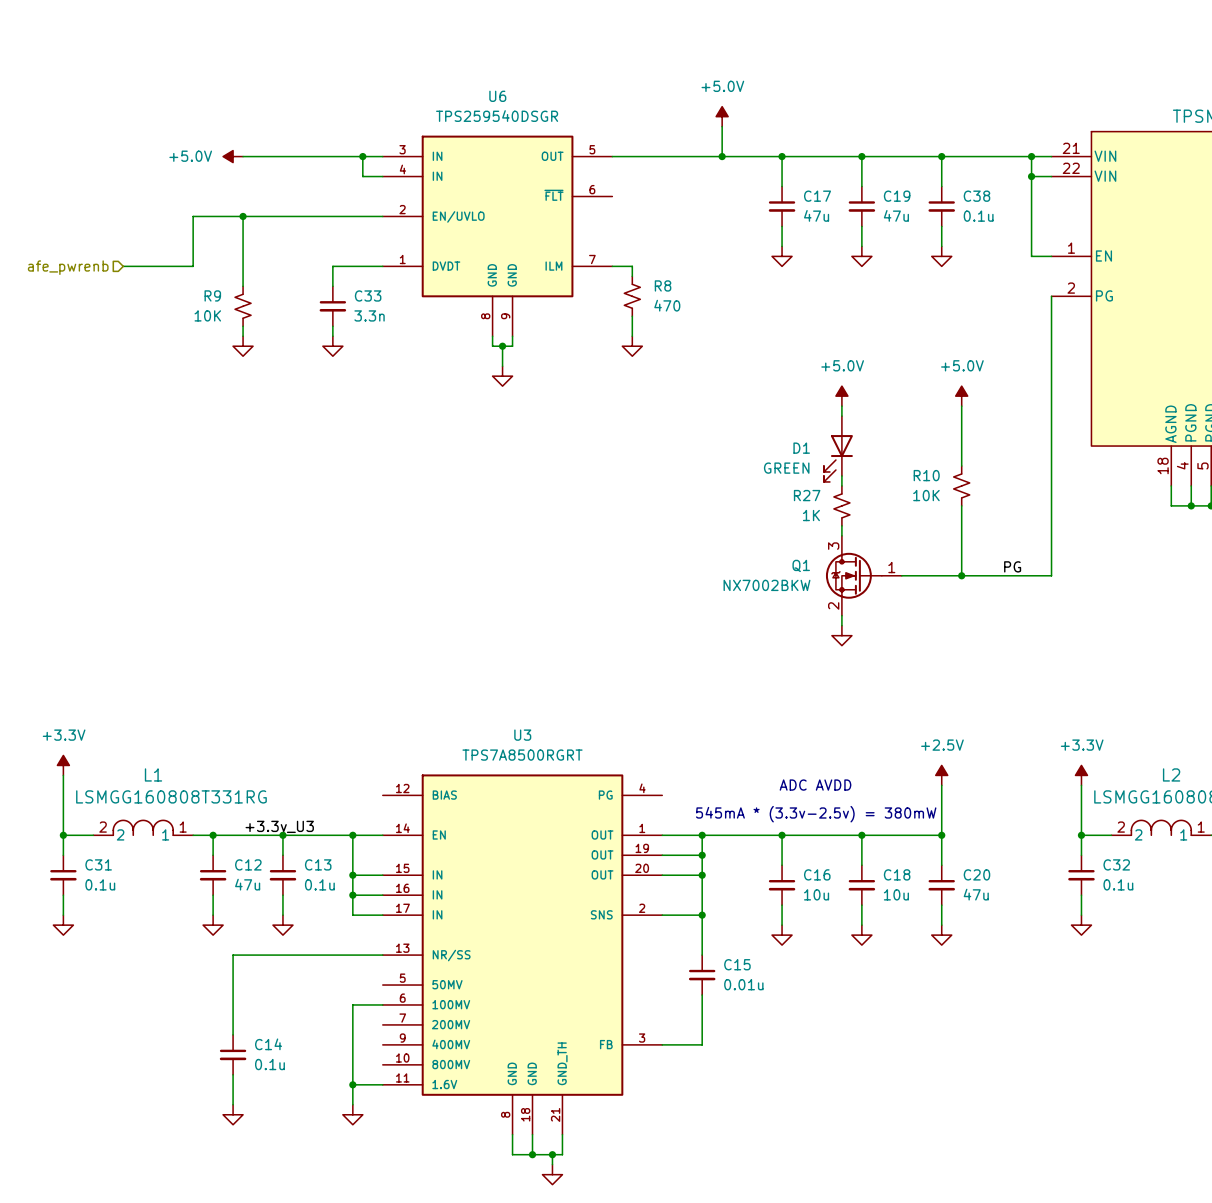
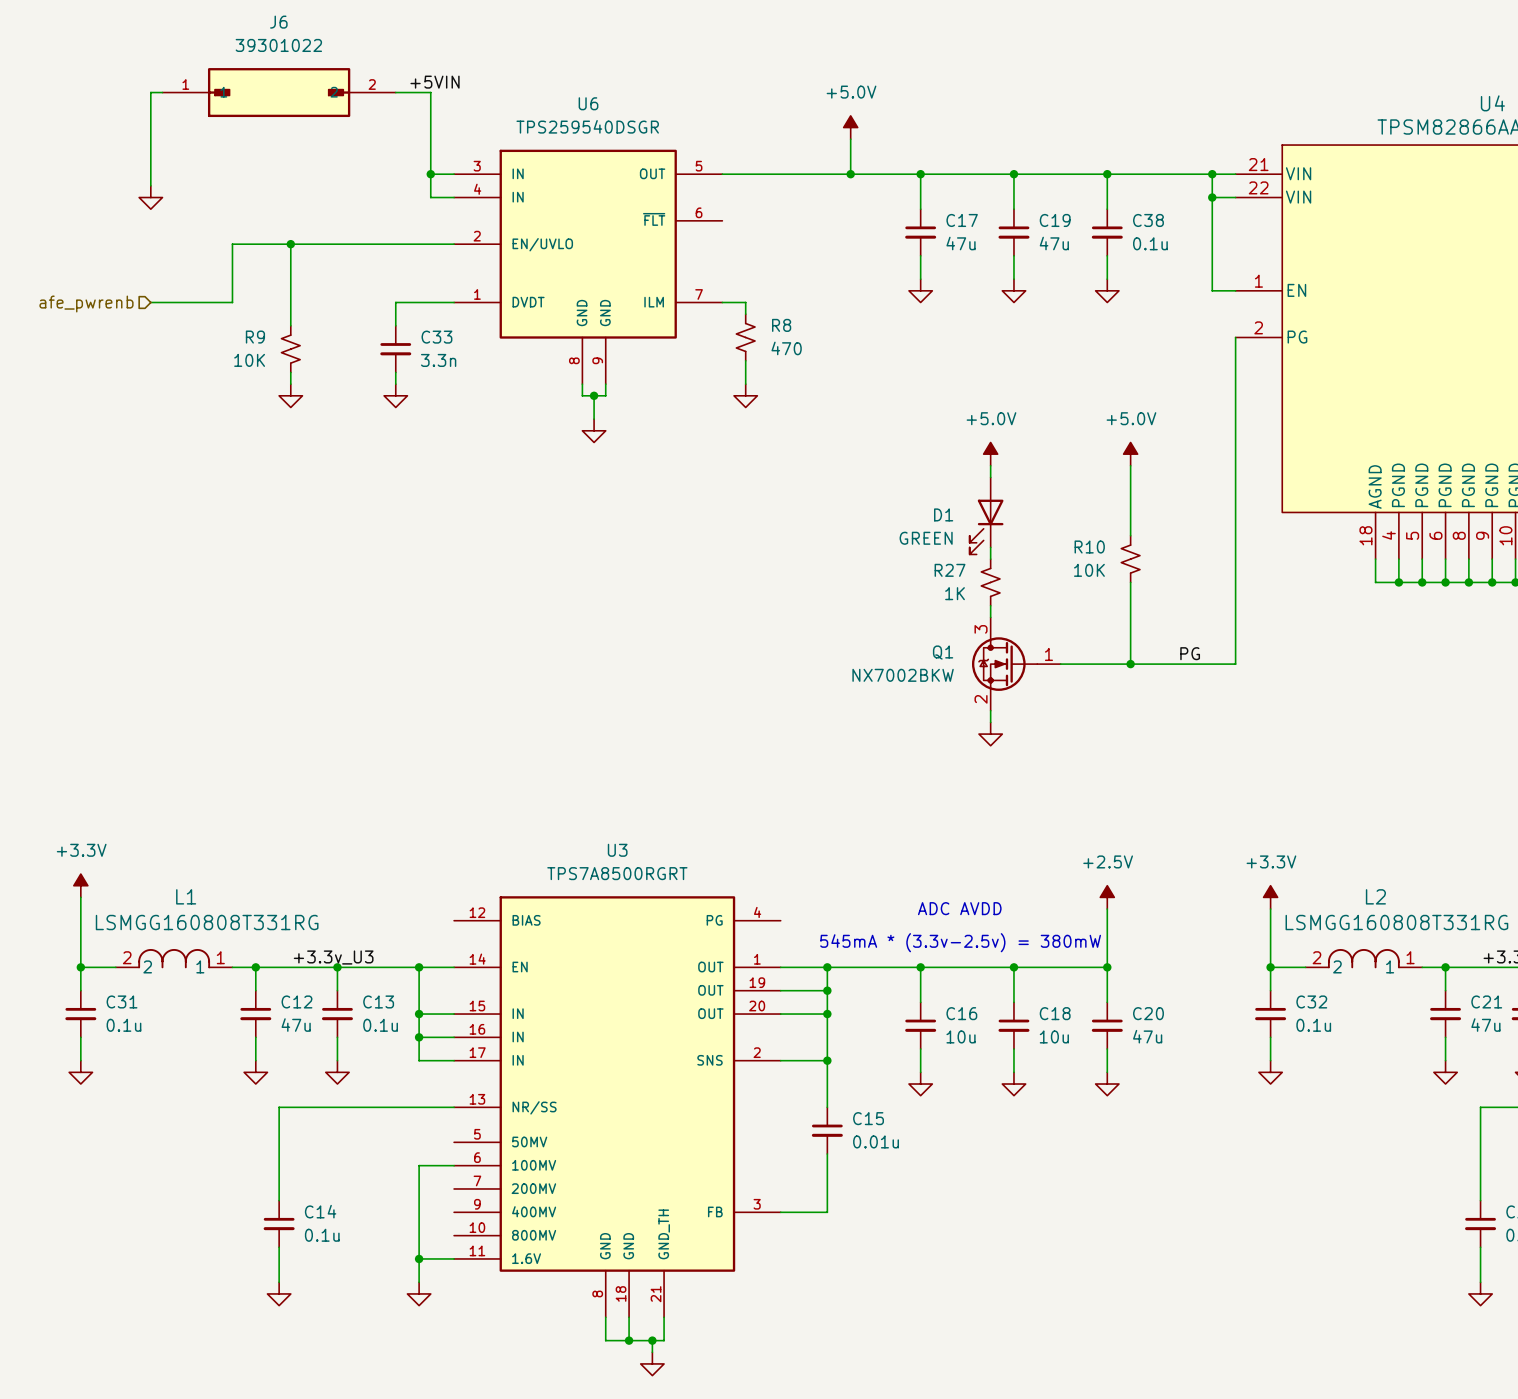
label: none -> +5VIN (435, 82)
wire: none -> (162, 92) (150, 92) (150, 185)
J6: none -> 39301022 (279, 92)
power symbol: +5.0V (233, 156) -> none
wire: (243, 156) (362, 156) -> (395, 92) (430, 92) (430, 174)
power symbol: none -> (150, 197)

